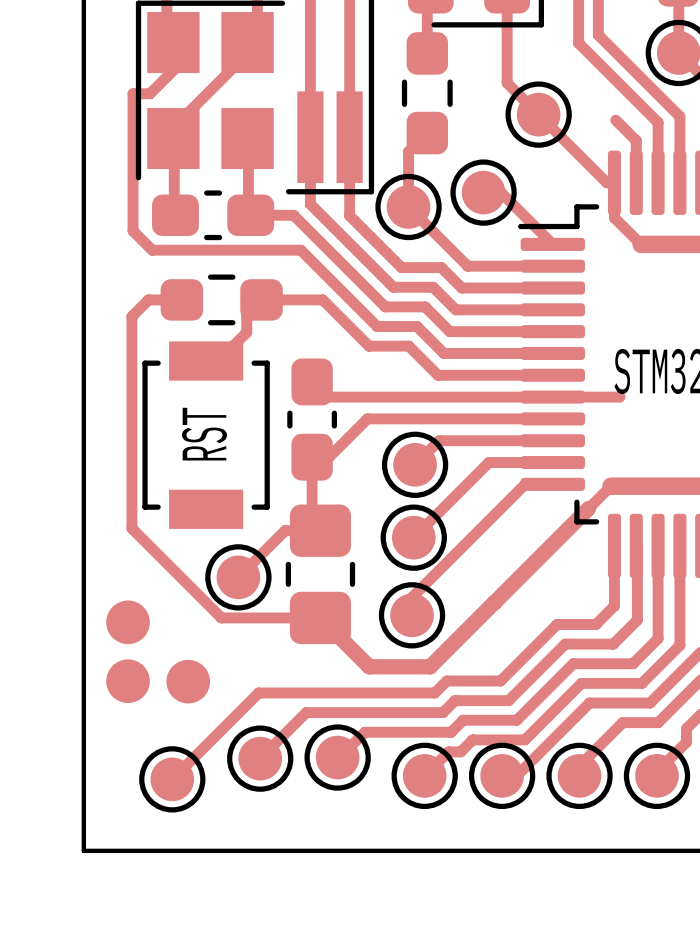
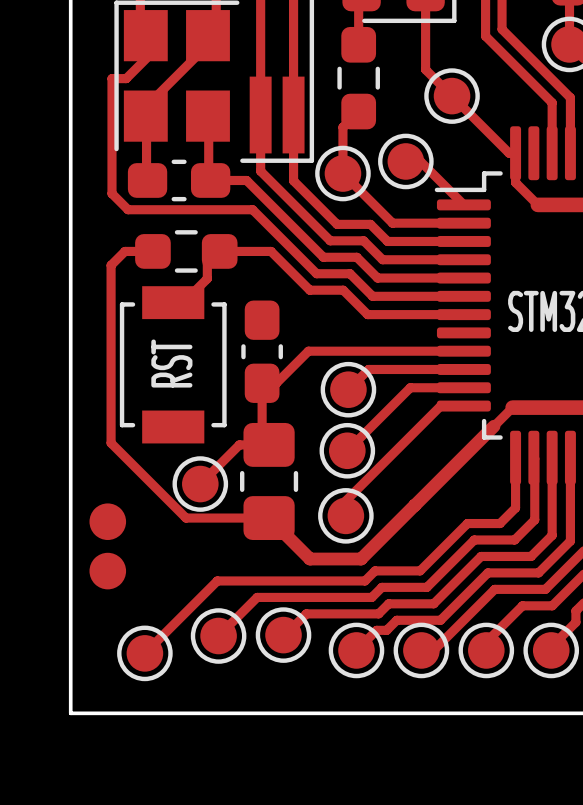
top track: (615, 120) (636, 140) (636, 182) -> none
top track: (312, 381) (327, 397) (620, 397) -> none
part: (188, 681) -> none

